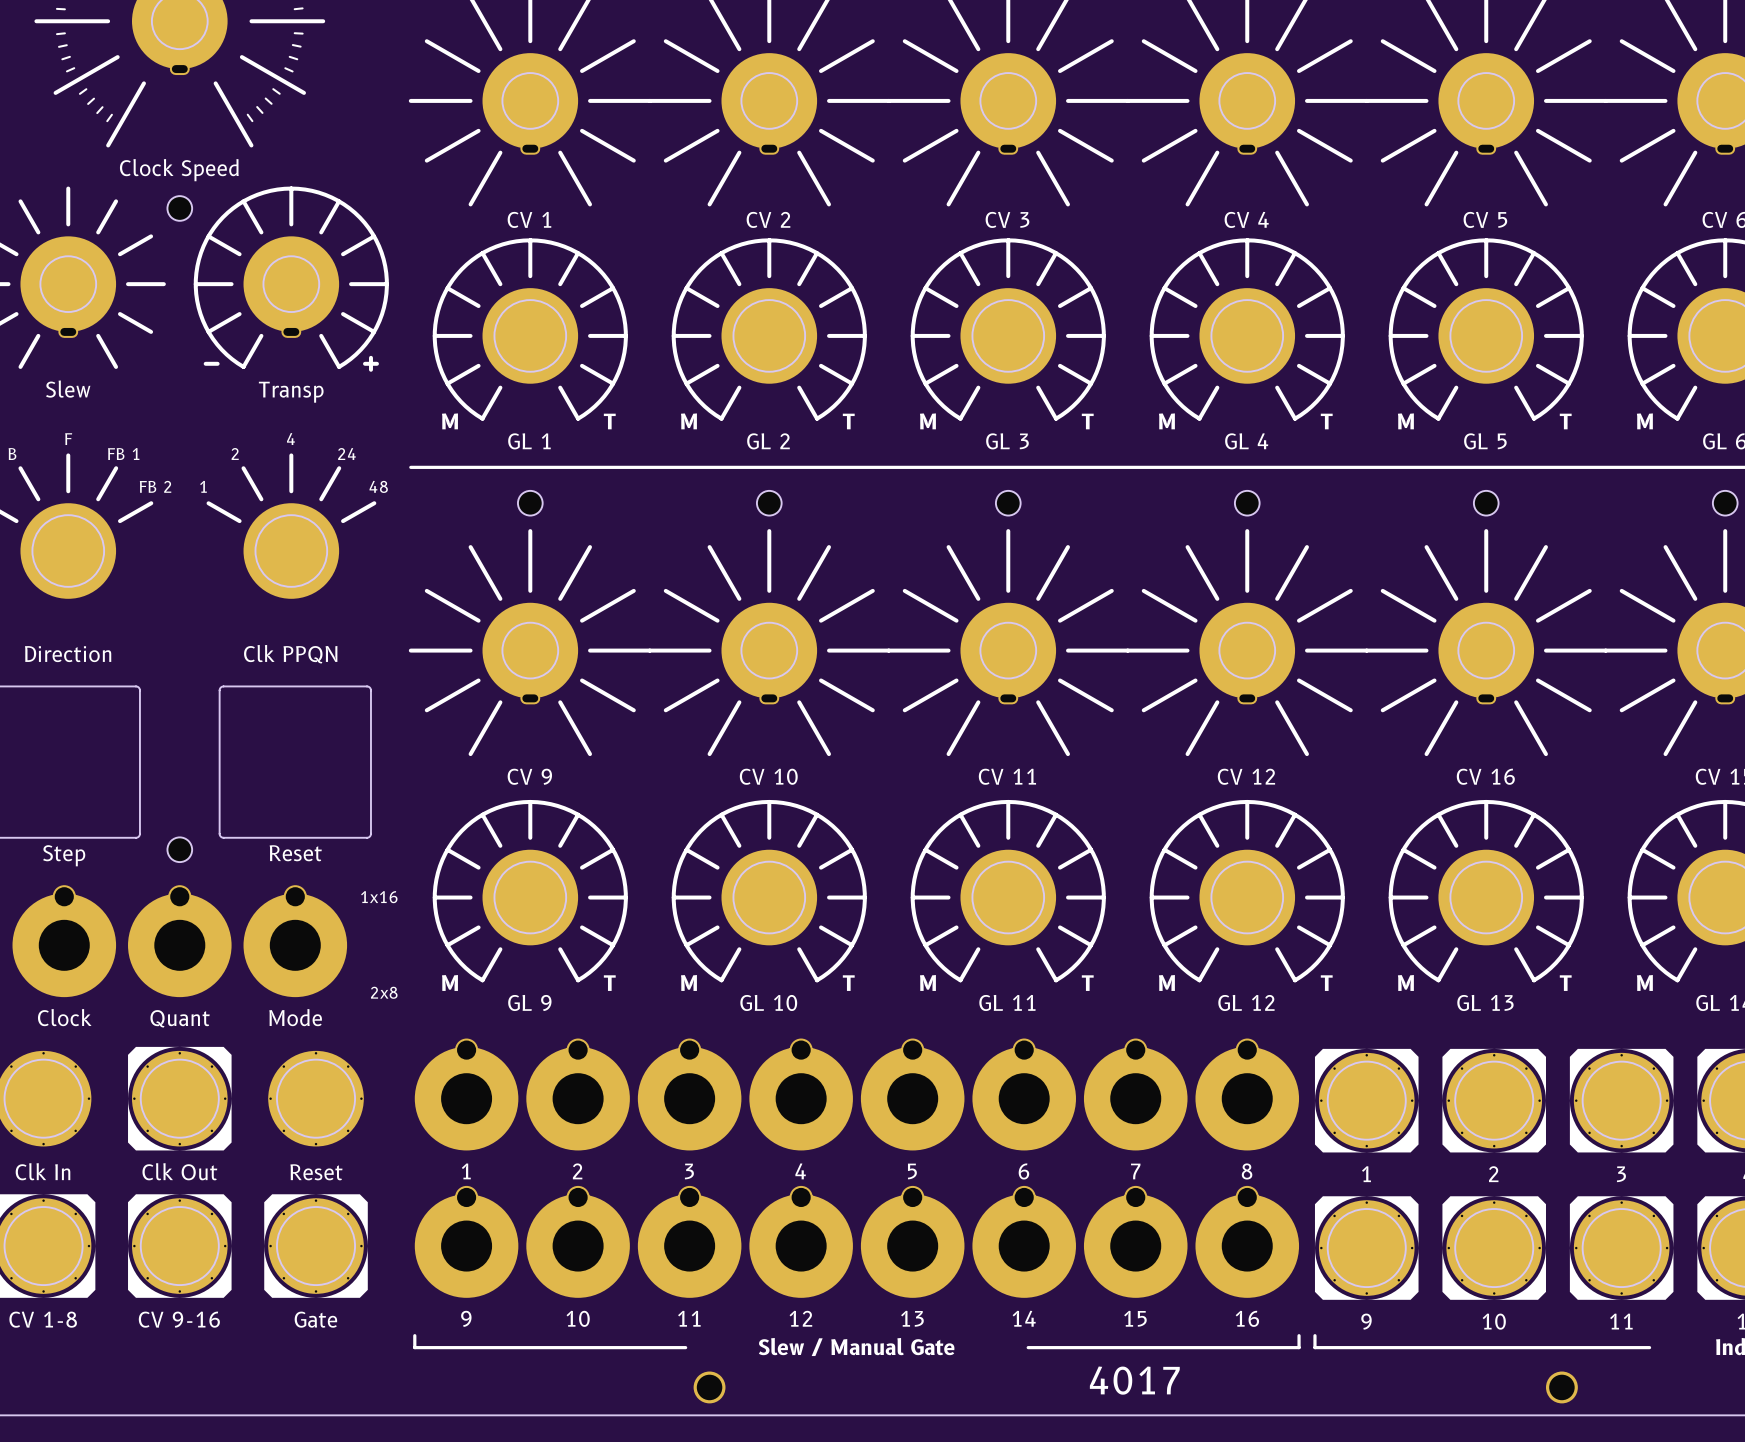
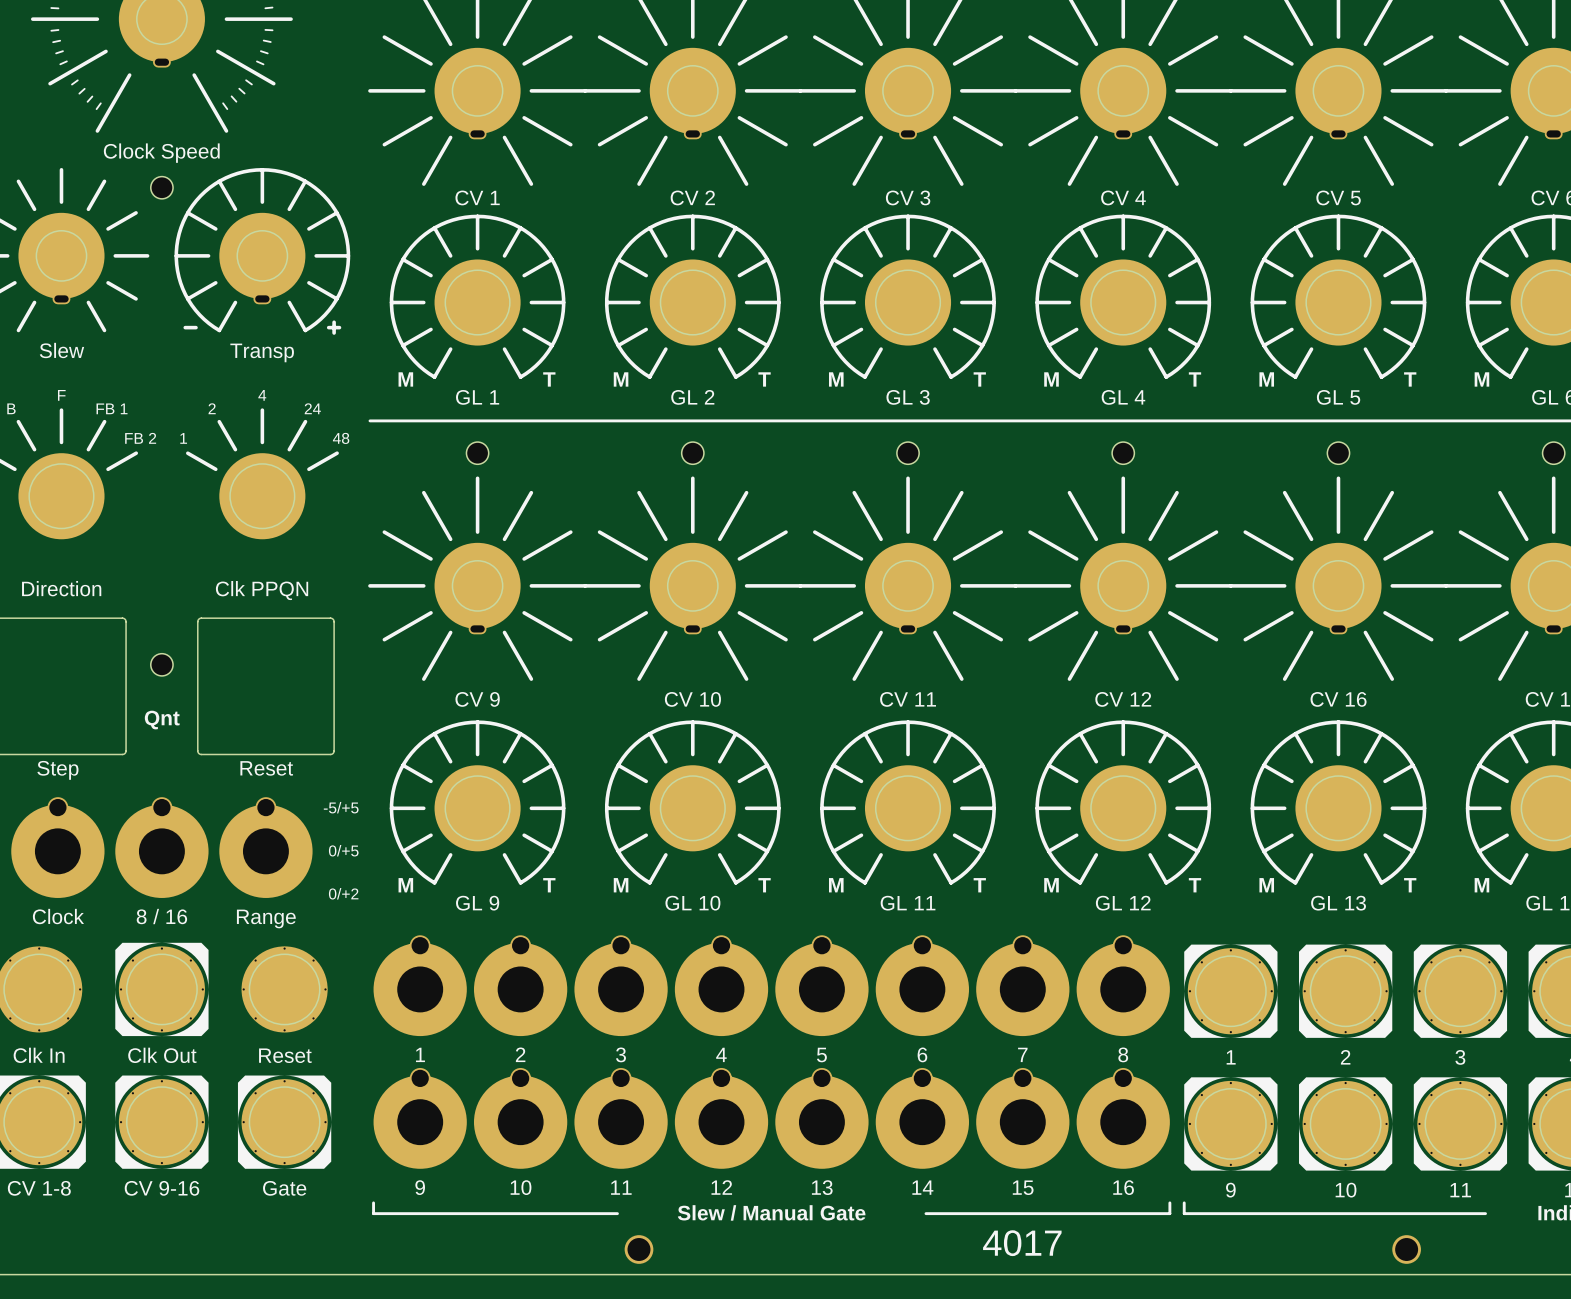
text: none -> Qnt (162, 720)
part position: (179, 849) -> (161, 664)
text: 1x16 (379, 897) -> -5/+5 (341, 807)
text: none -> 0/+5 (343, 850)
text: 2x8 (384, 992) -> 0/+2 (343, 893)
part value: Mode (295, 1017) -> Range (266, 918)
part value: Quant (180, 1018) -> 8 / 16 (161, 916)

